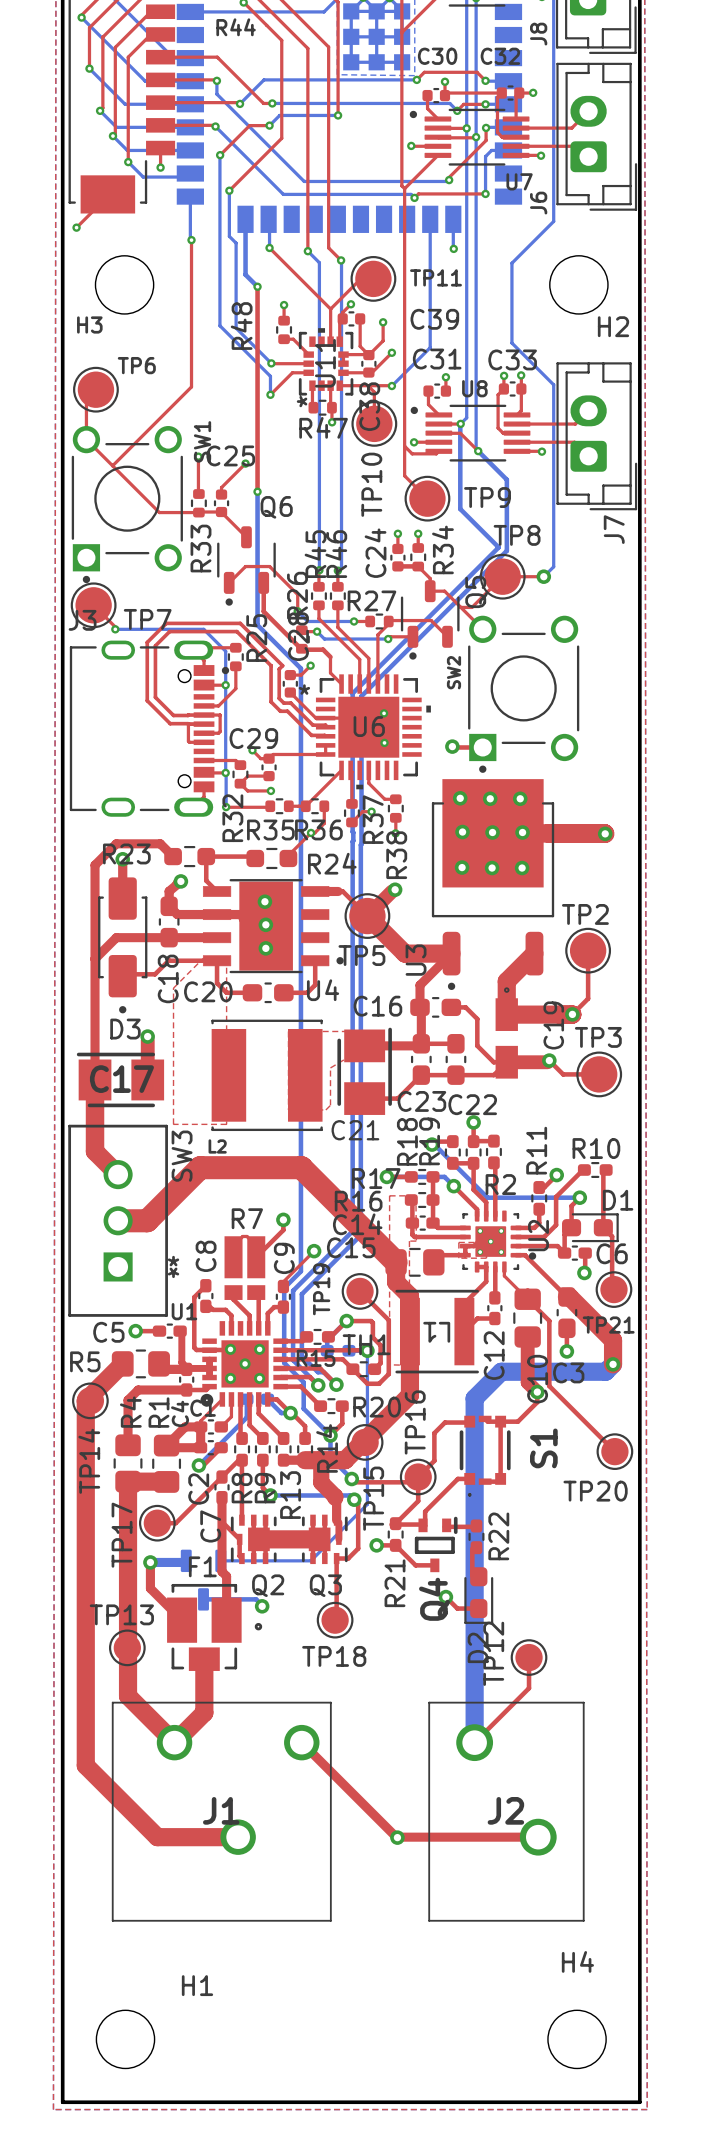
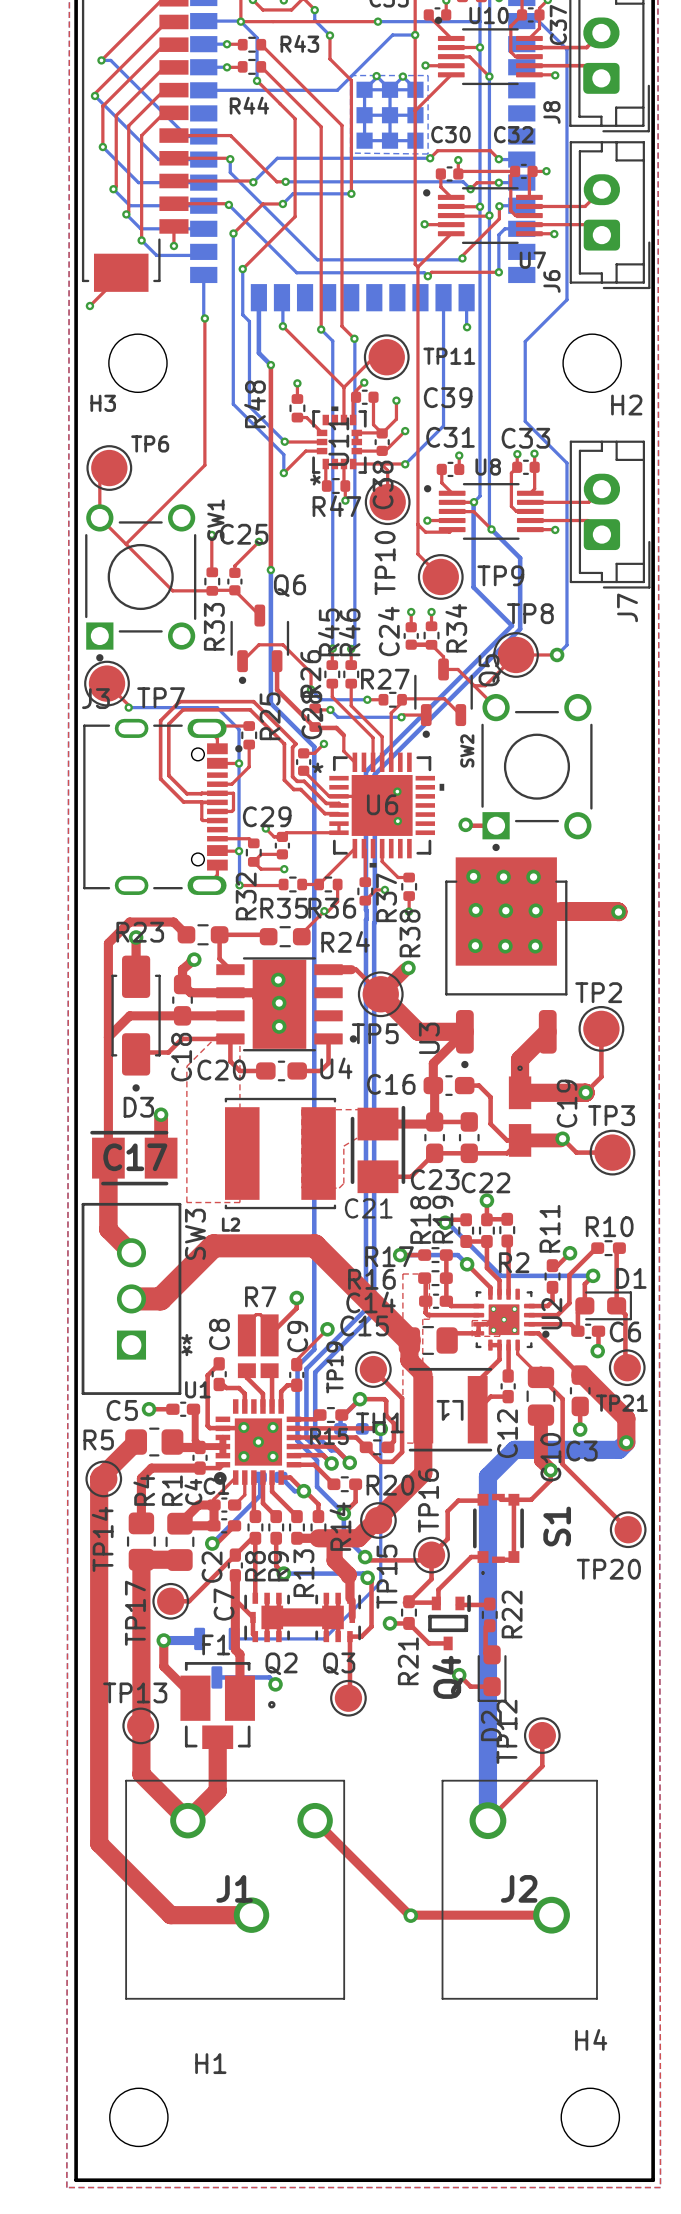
TP18 name: TP18 (334, 1656) -> none

